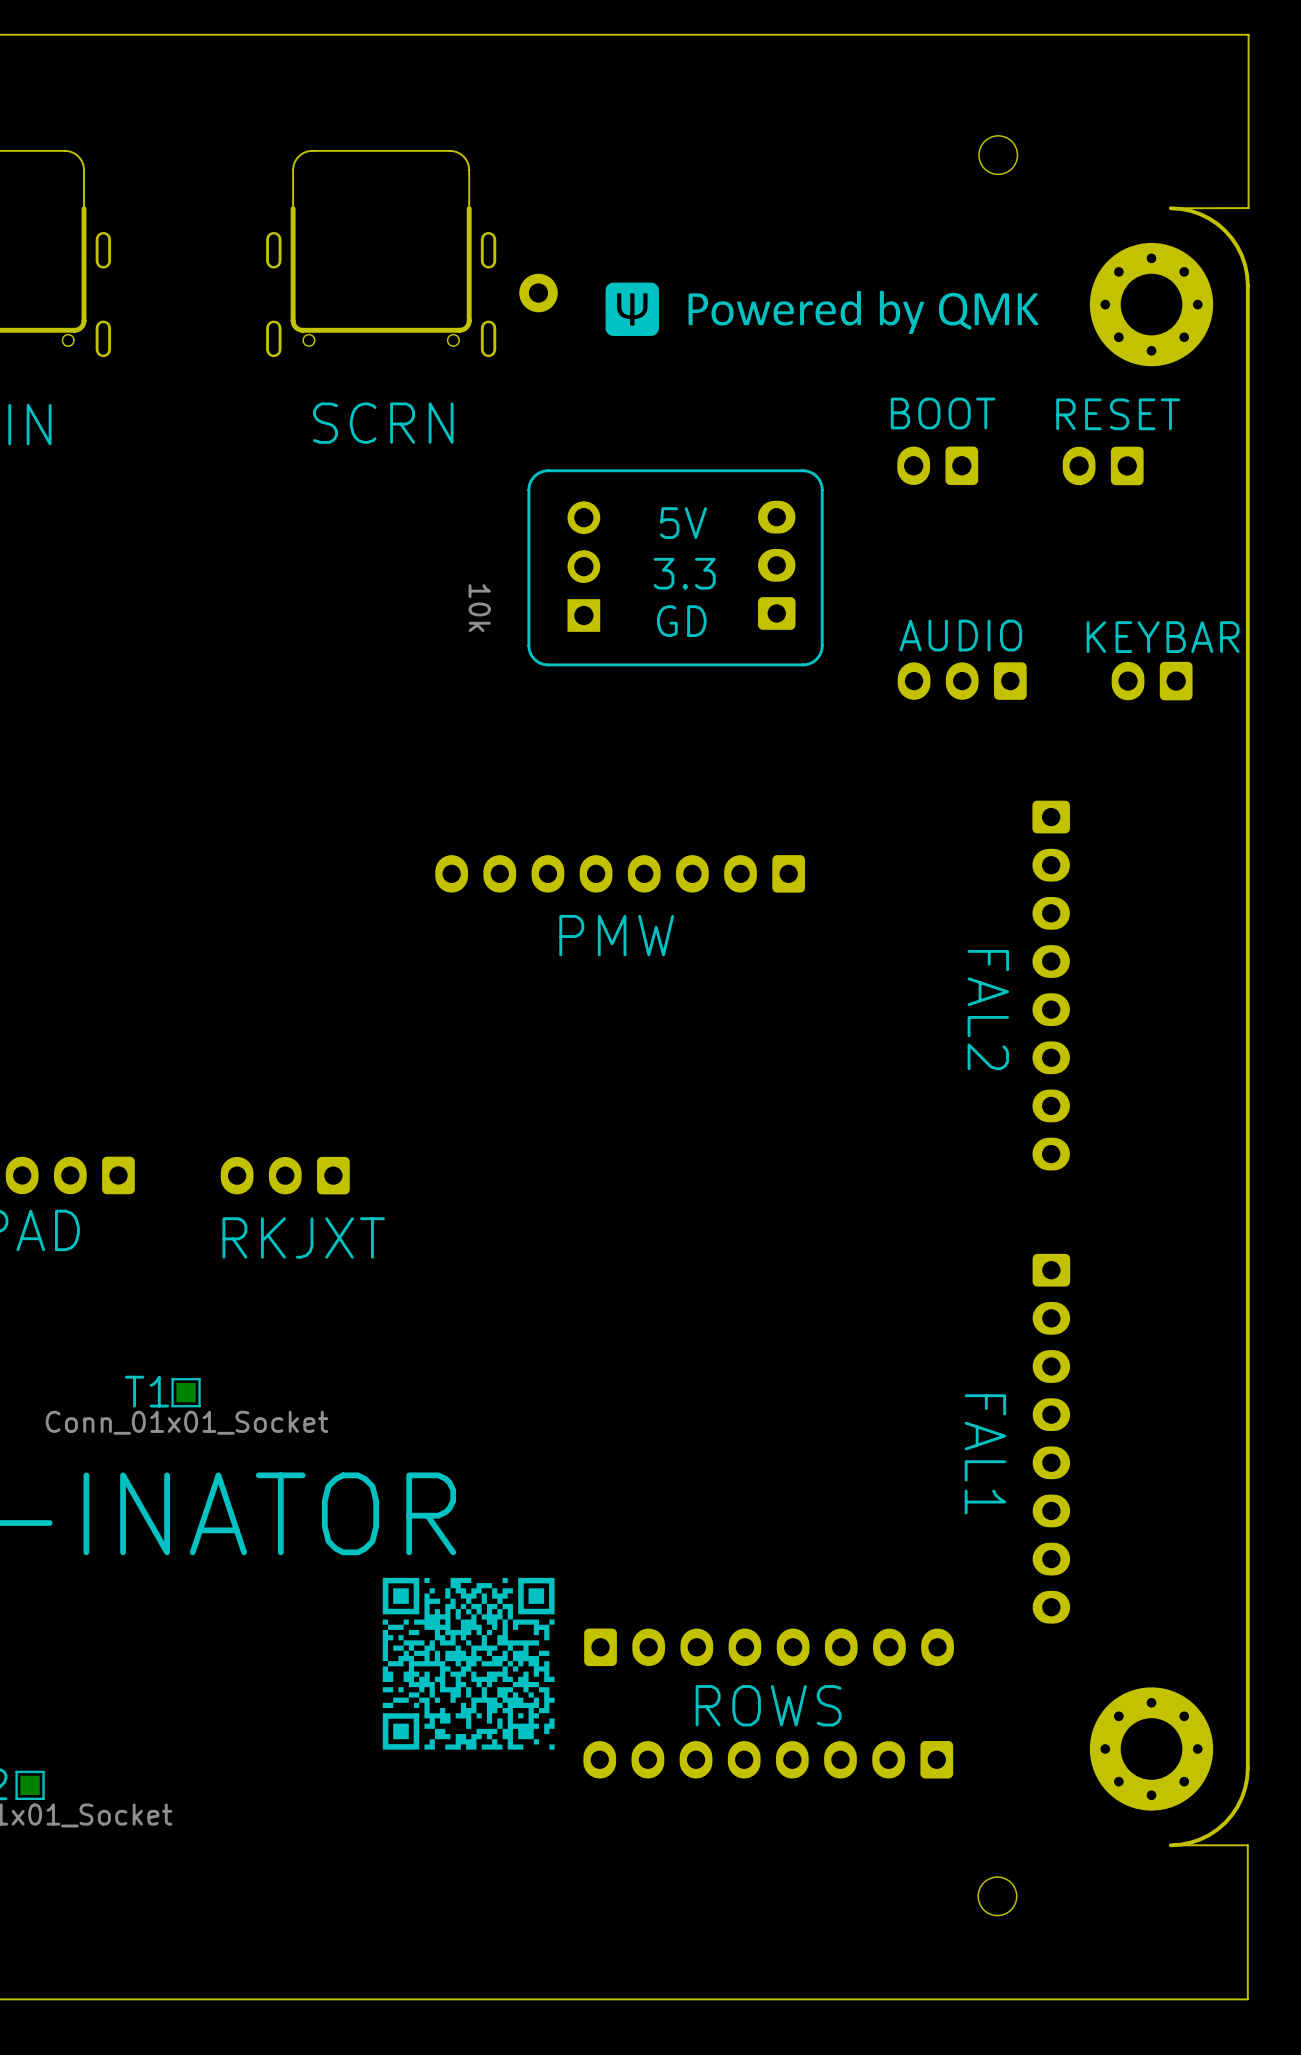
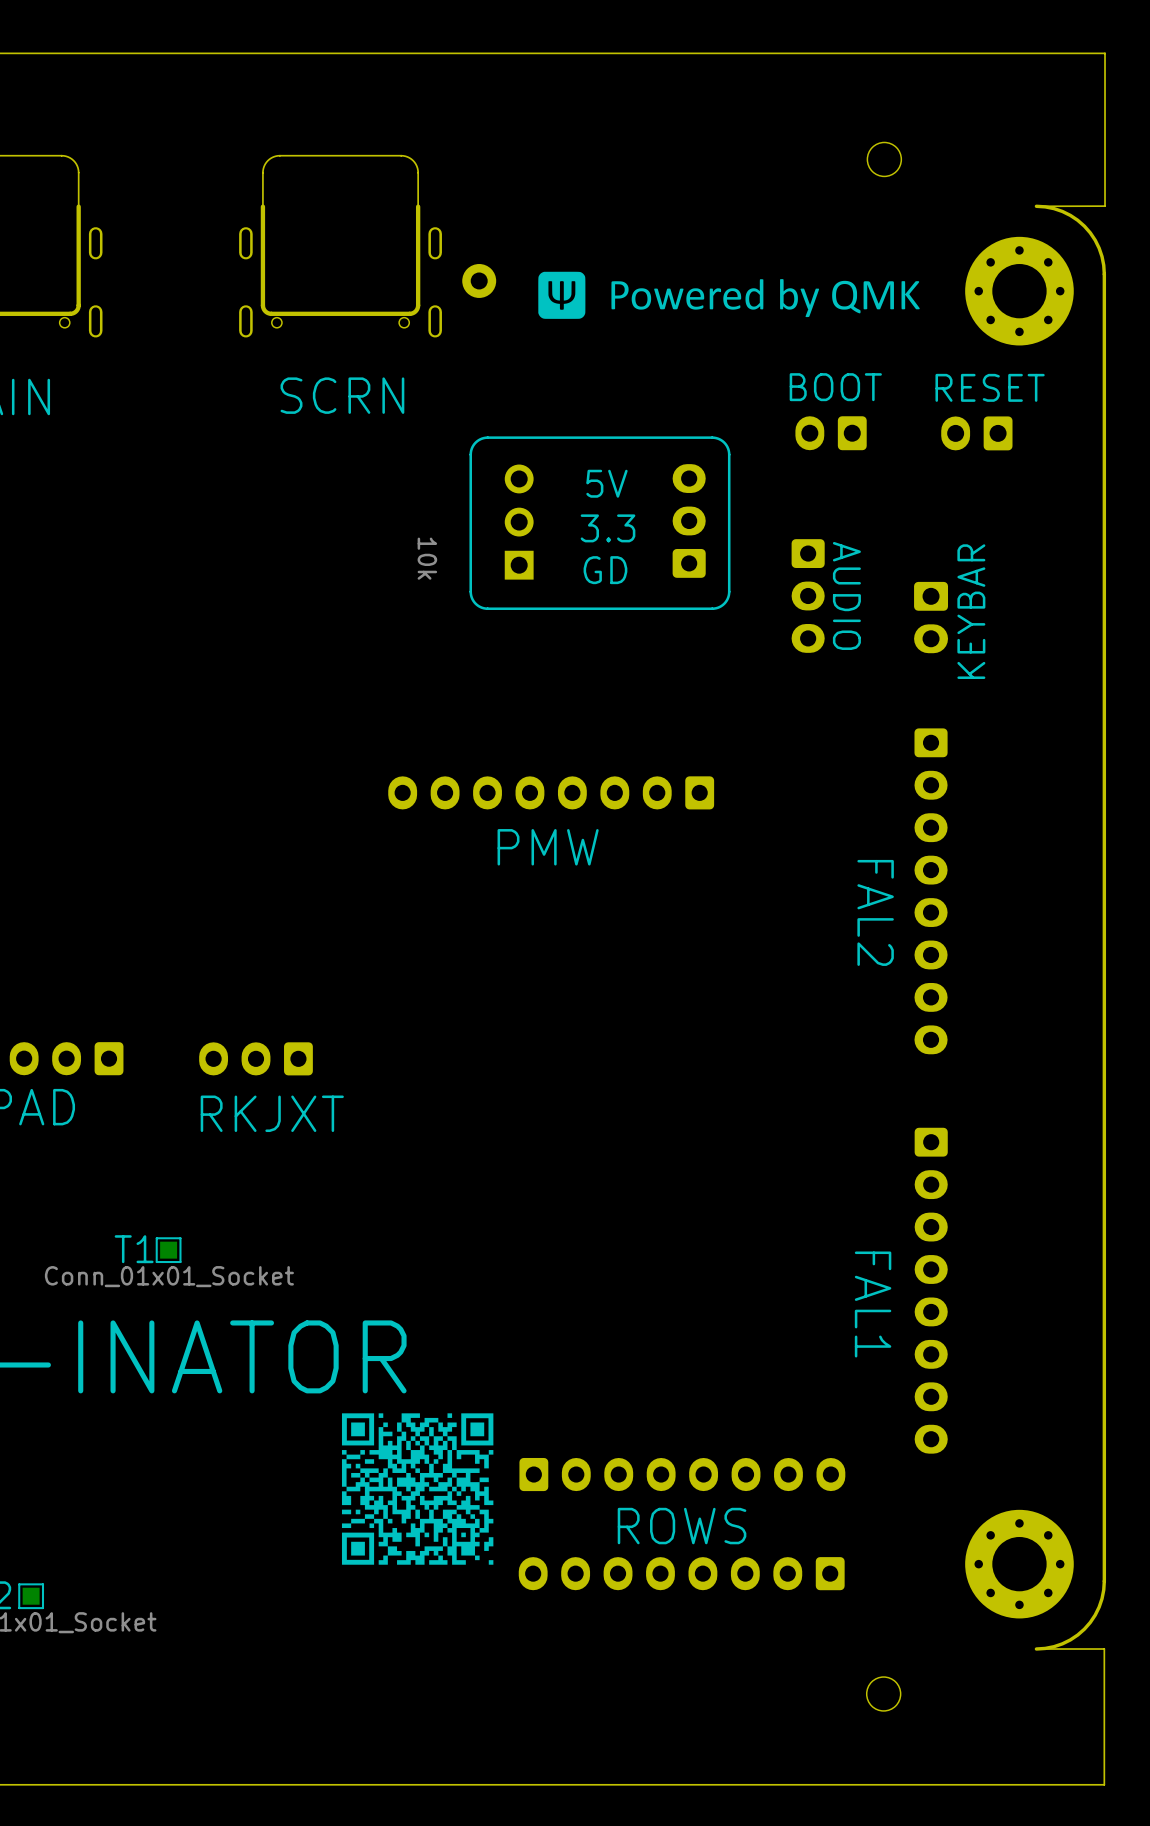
text rotation: 0° (960, 635) -> 90° clockwise (846, 595)
text rotation: 0° (1163, 637) -> 90° counterclockwise (971, 611)
part rotation: 0° (962, 681) -> 90° counterclockwise (808, 596)
part rotation: 0° (1152, 681) -> 90° counterclockwise (931, 617)
part position: (1152, 681) -> (931, 617)

